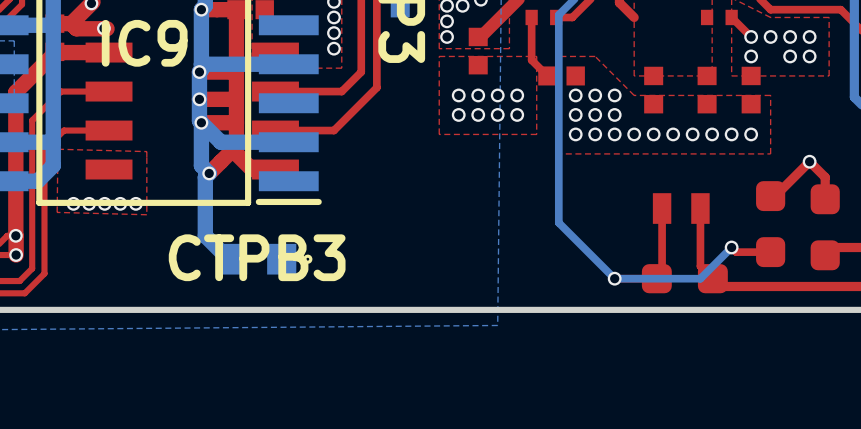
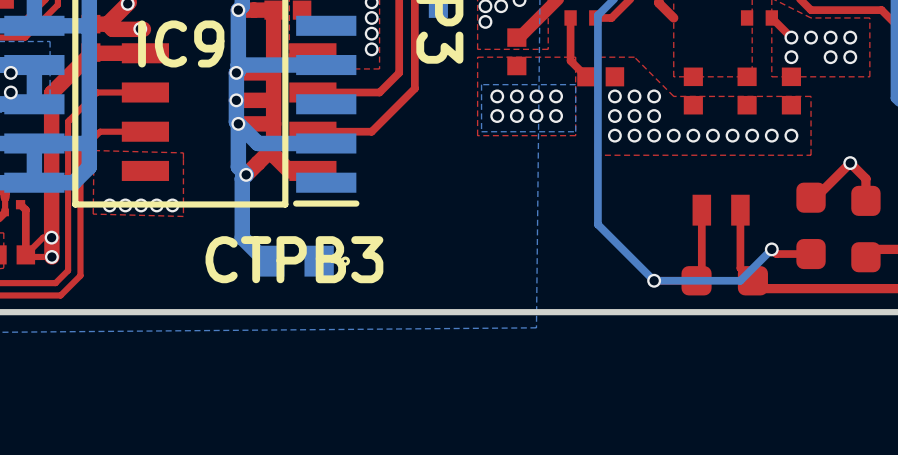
via: (447, 36) -> none
bottom zone outline: none -> (575, 84) (481, 84) (481, 131) (575, 131) (575, 84)

